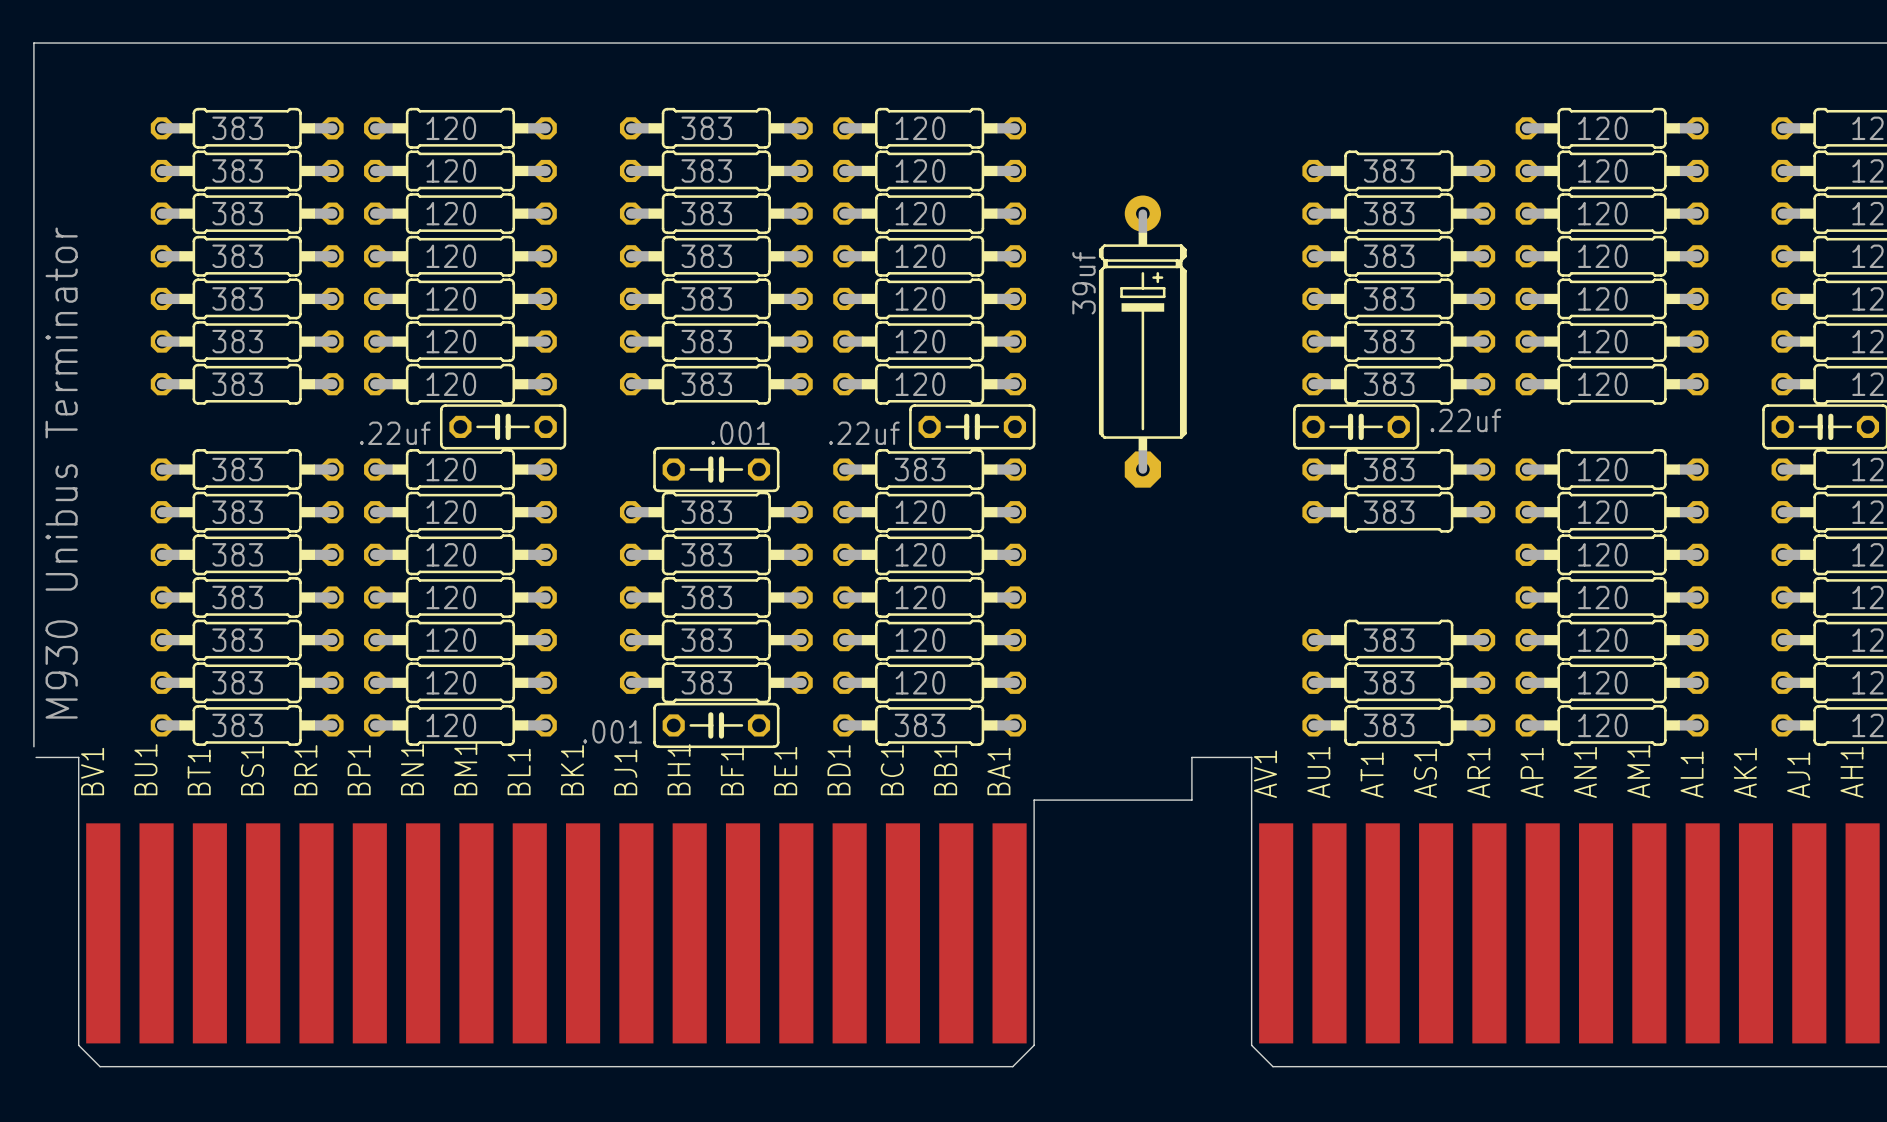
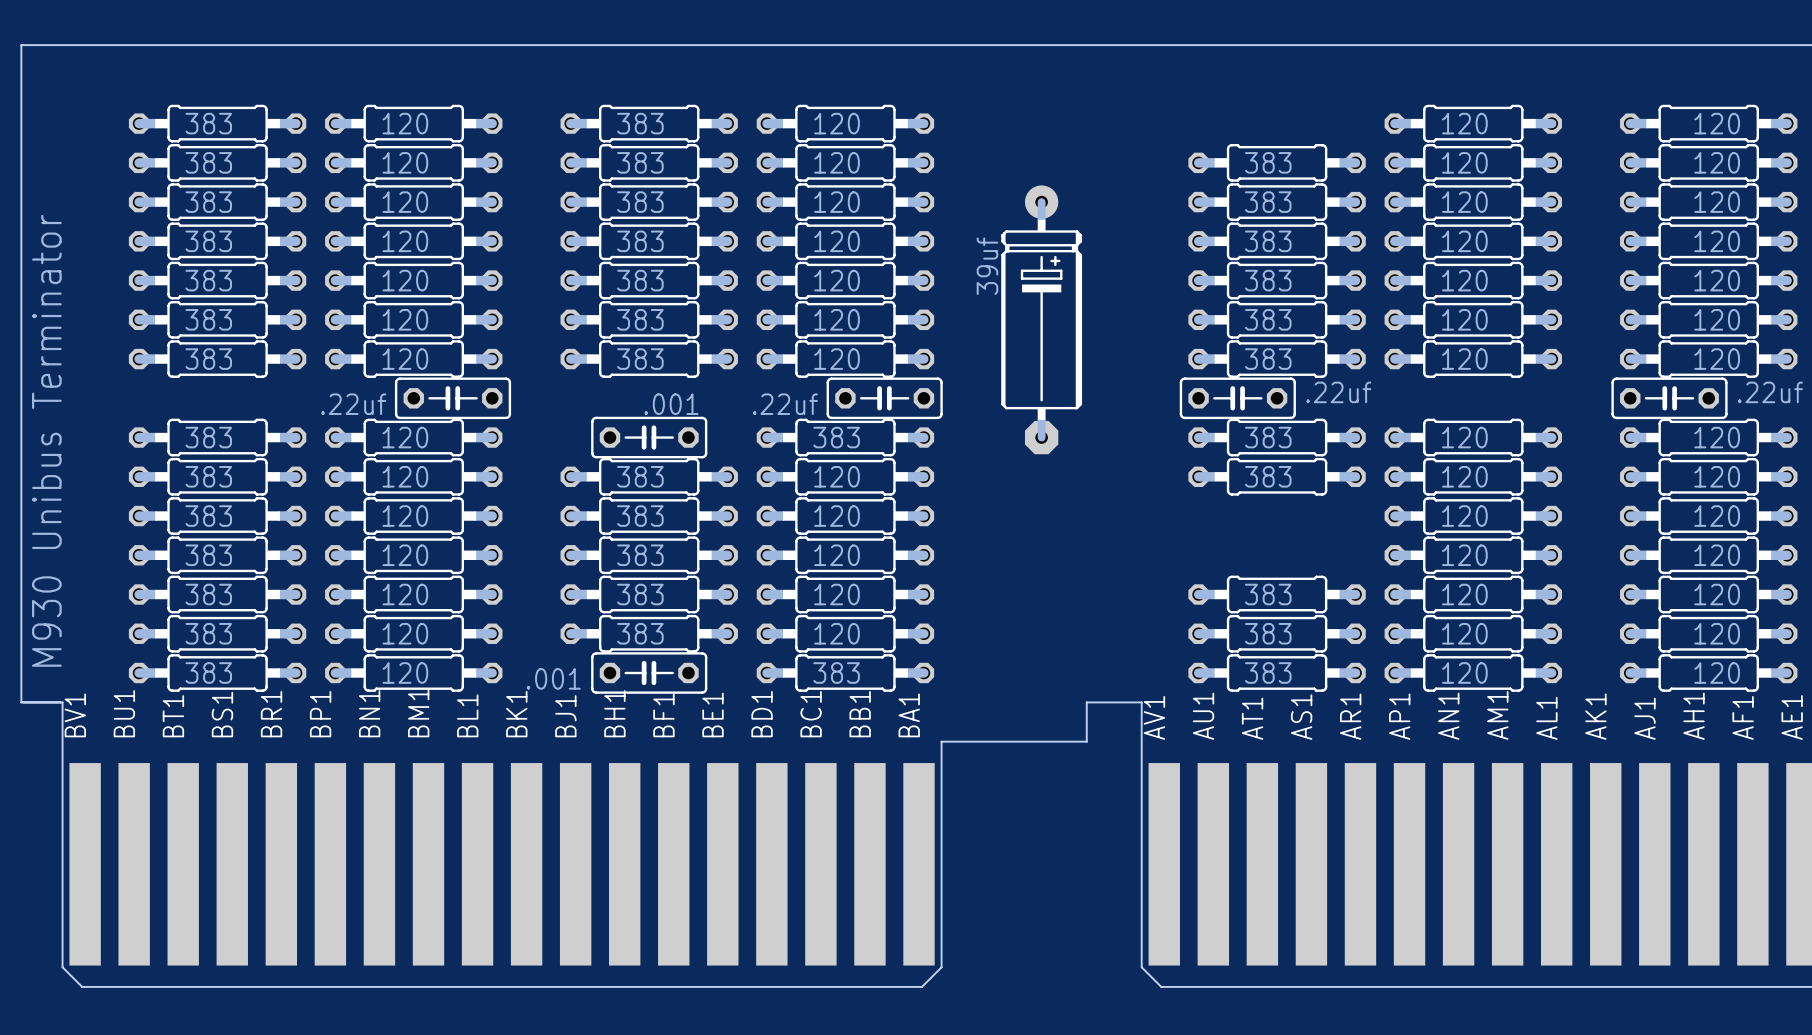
board edge: none -> (21, 692) (21, 702) (60, 702)

